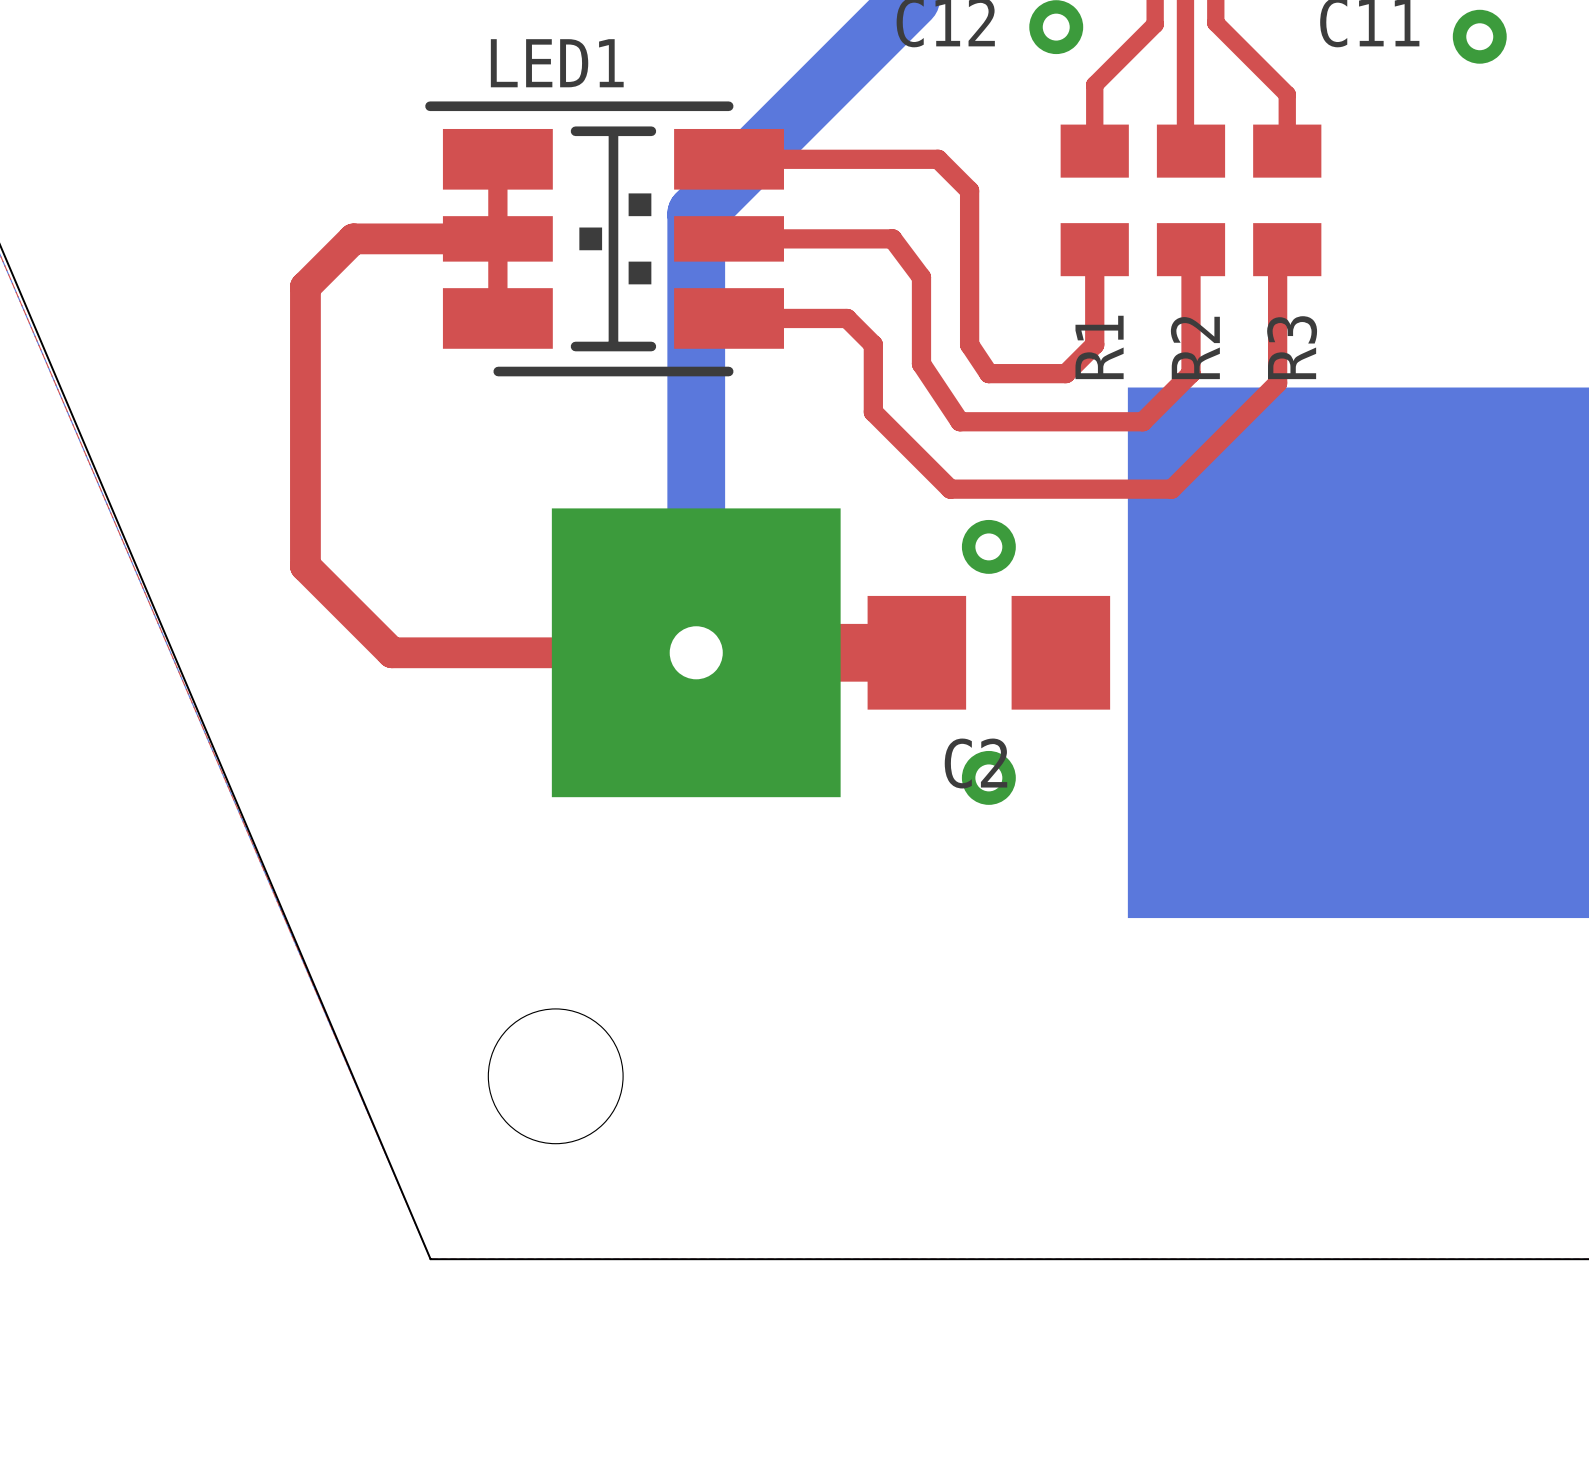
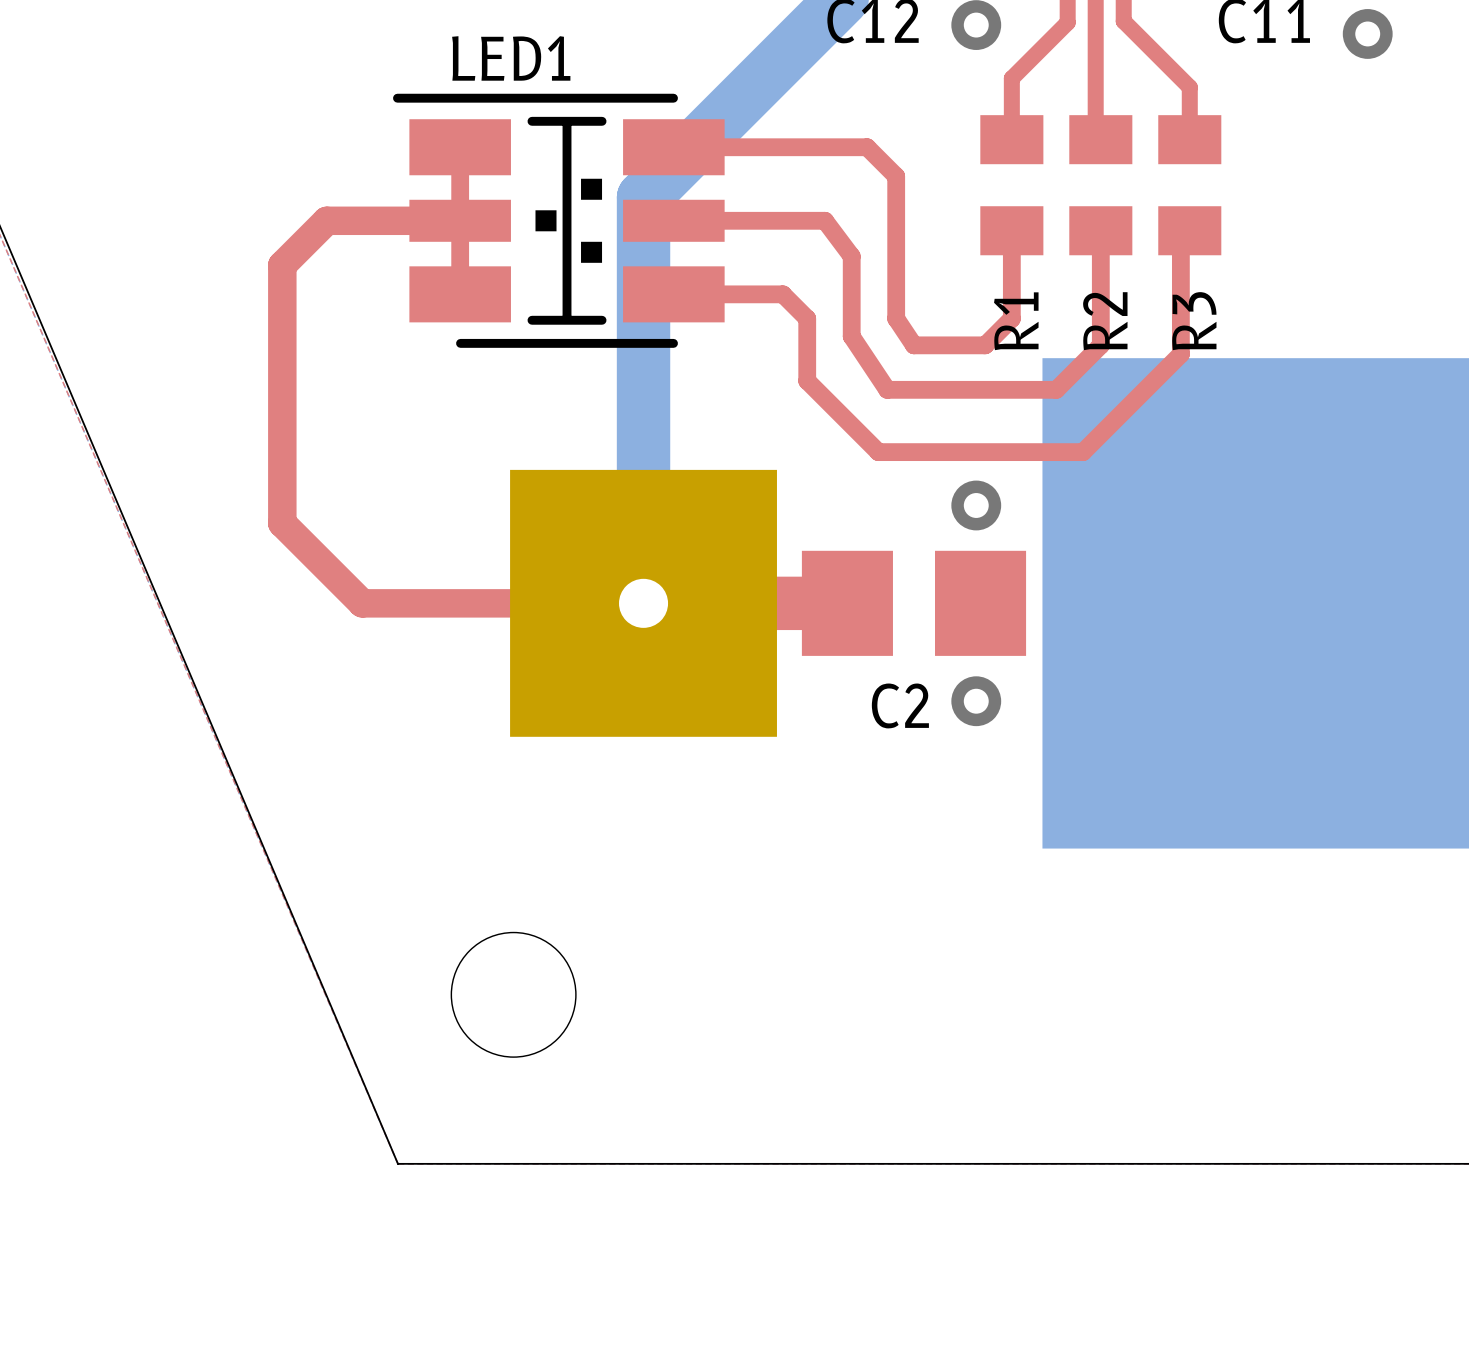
via position: (988, 546) -> (976, 505)
via position: (988, 777) -> (976, 701)

